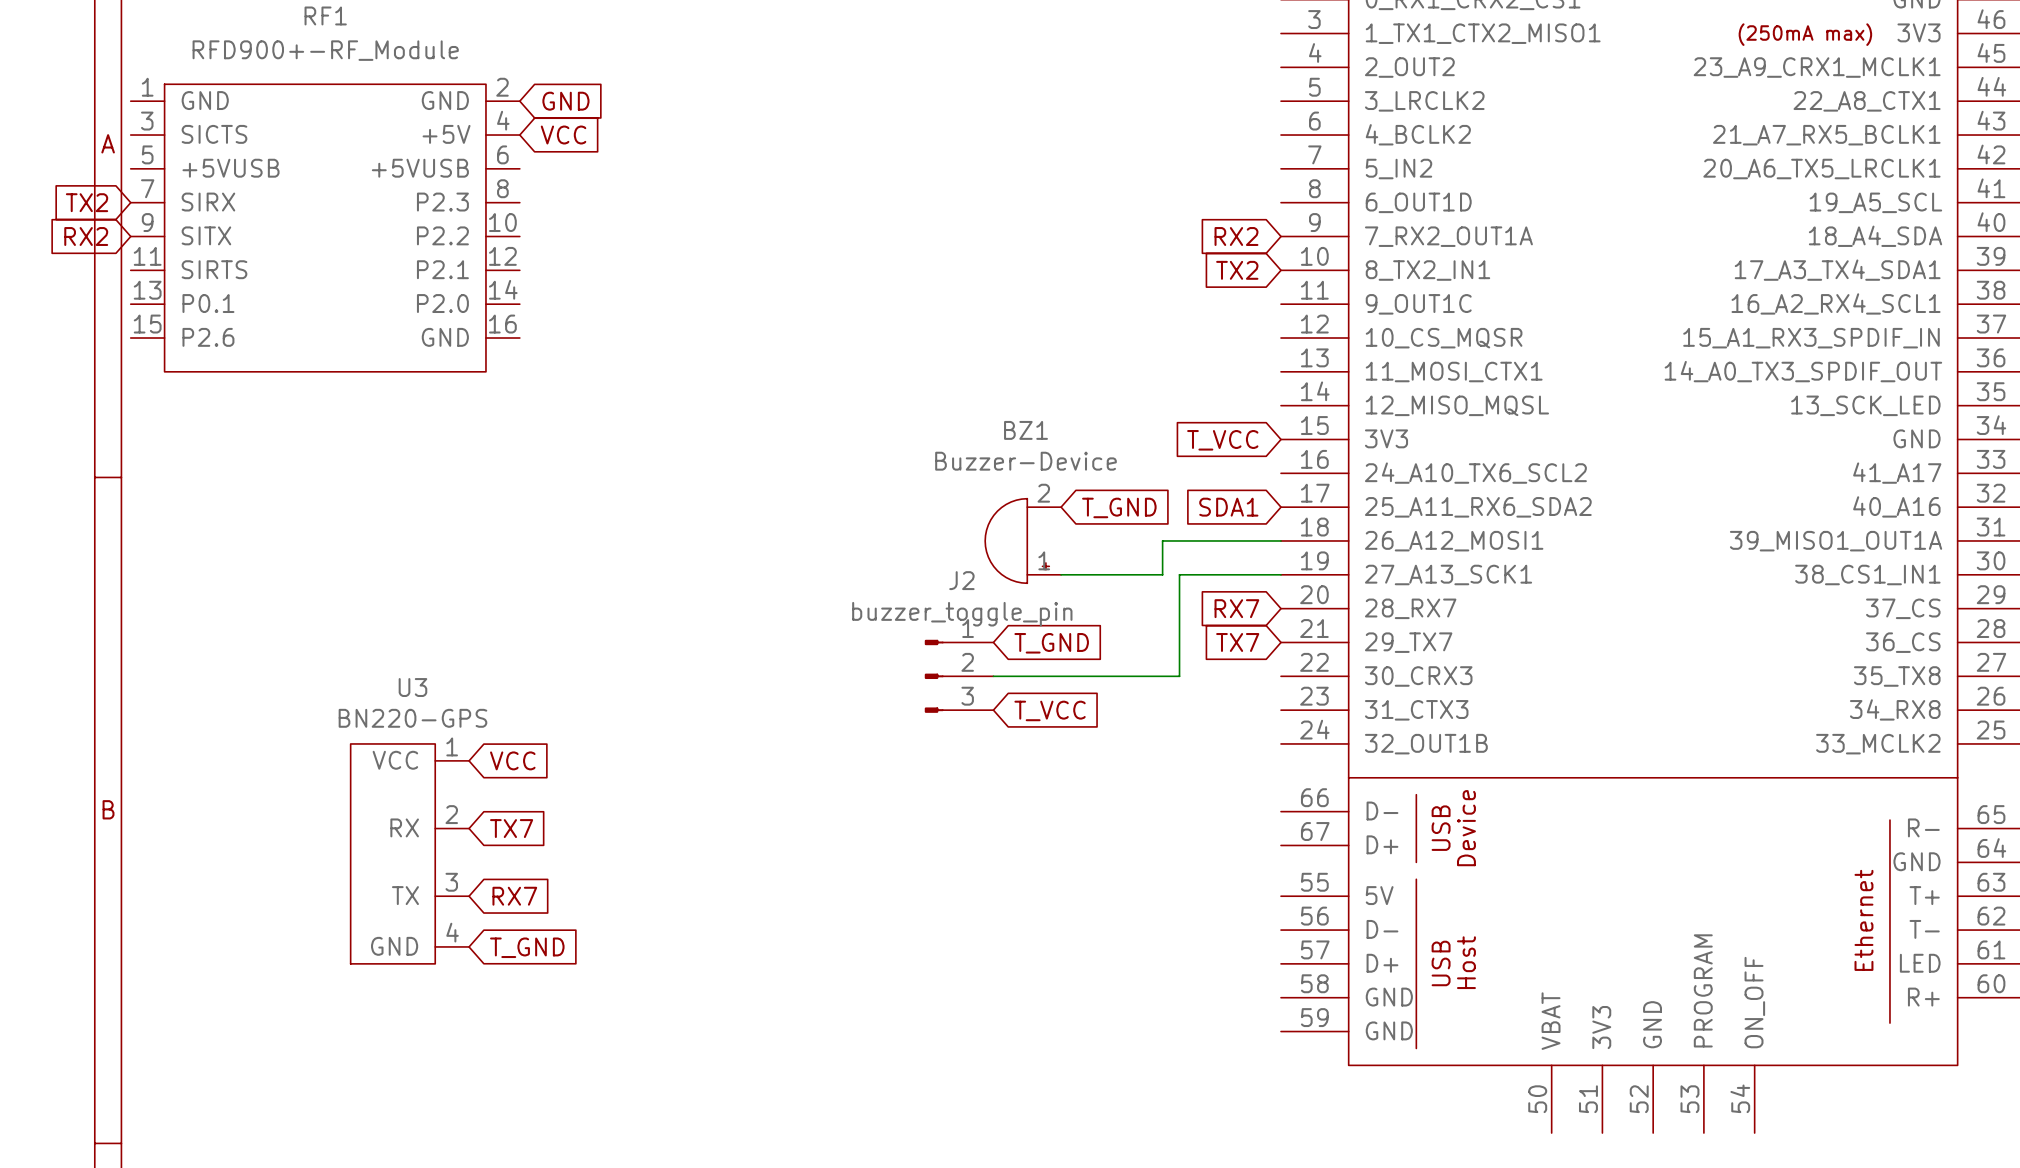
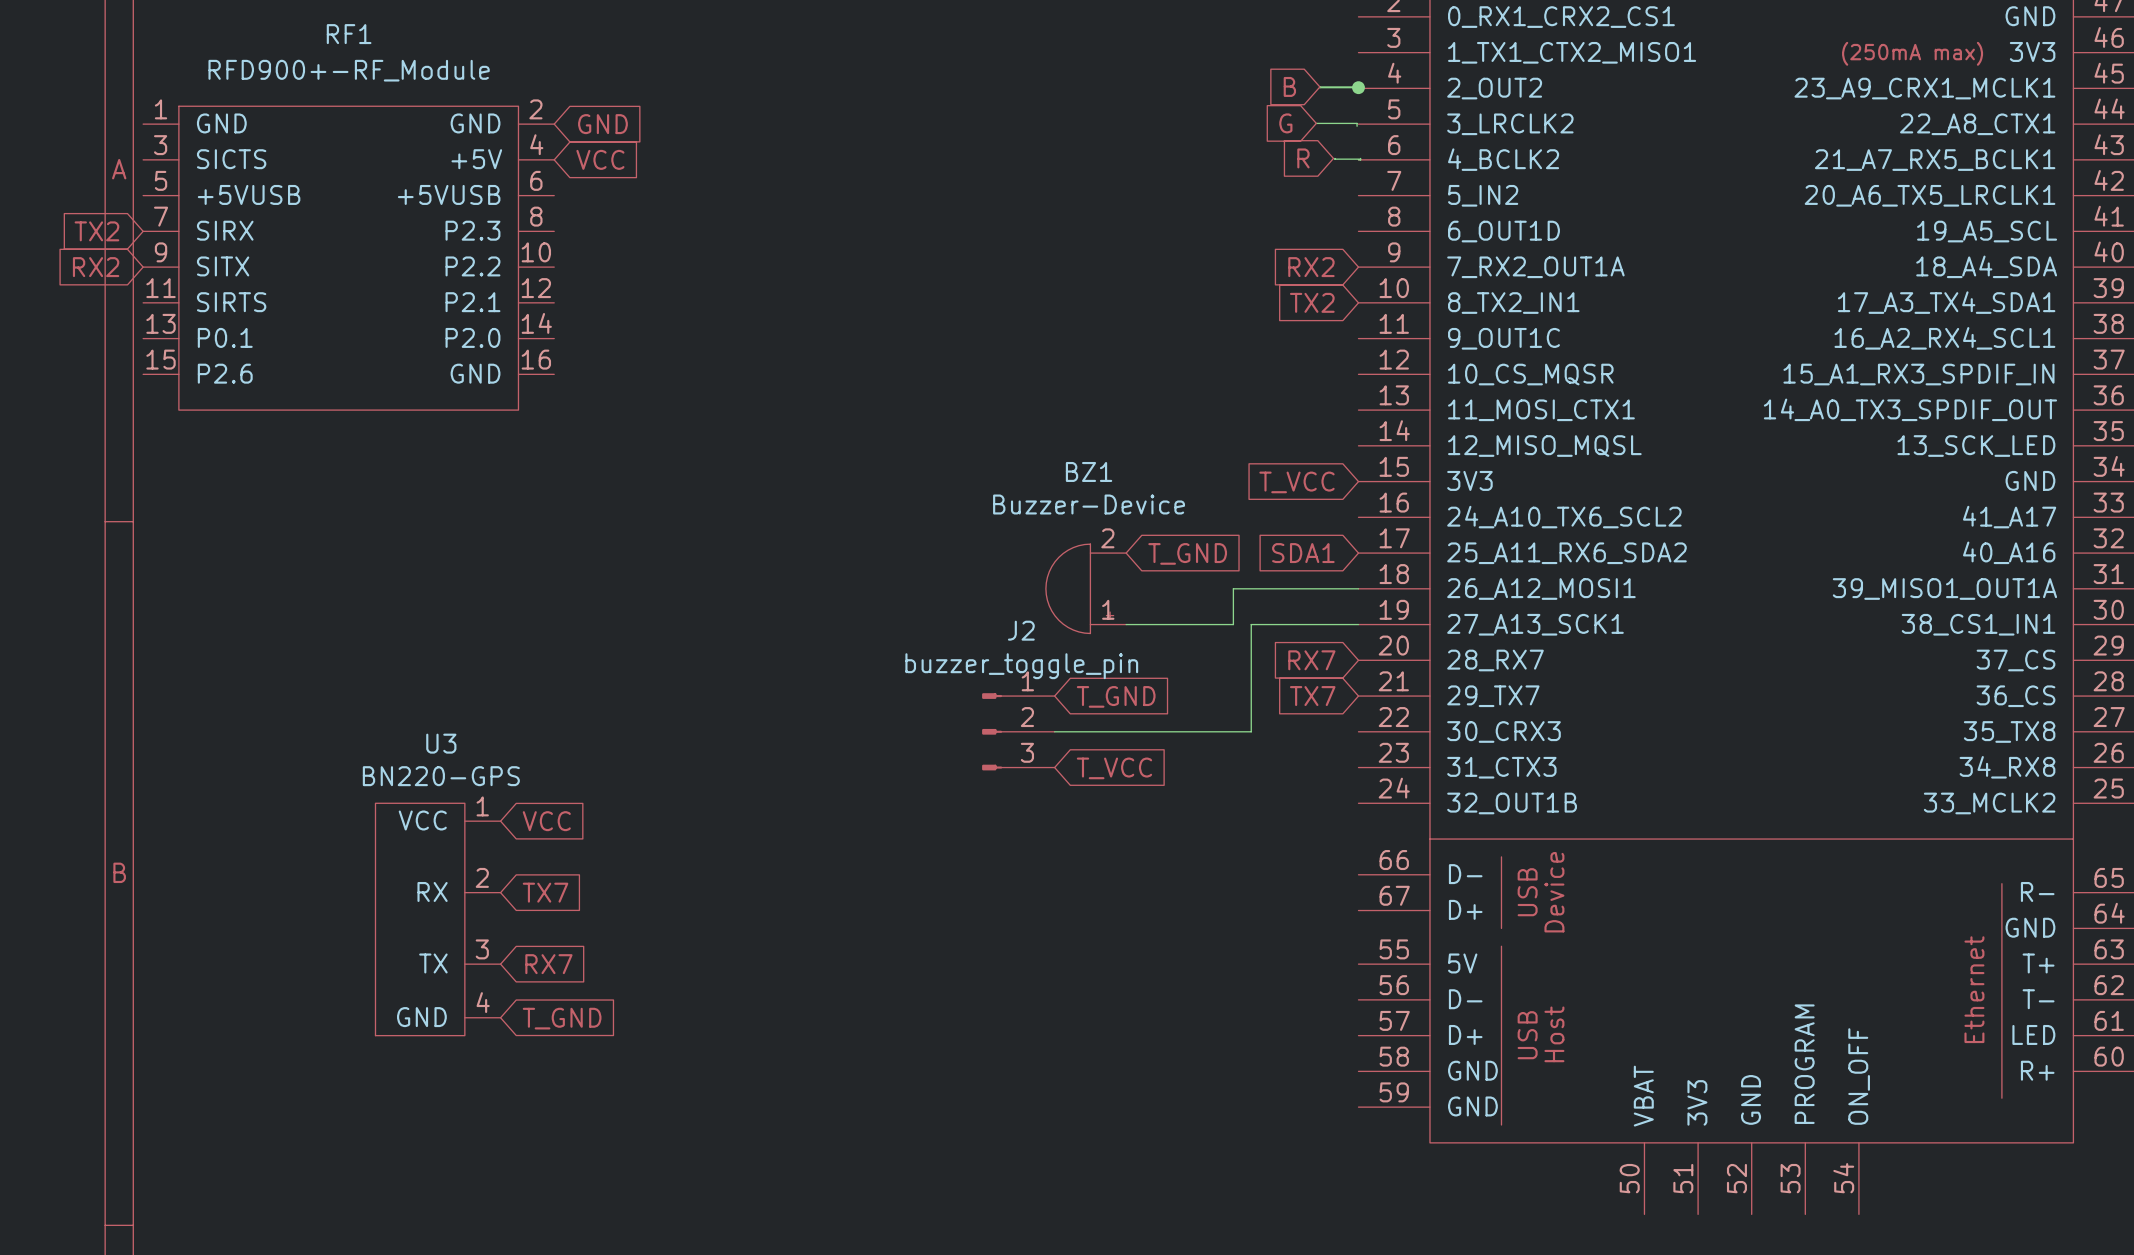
global label: none -> B (1289, 86)
wire: none -> (1319, 86) (1359, 86) (1359, 87) (1319, 87) (1319, 86)
junction: none -> (1358, 87)
global label: none -> G (1285, 123)
wire: none -> (1316, 123) (1357, 123) (1357, 126)
global label: none -> R (1303, 158)
wire: none -> (1334, 158) (1359, 159)

